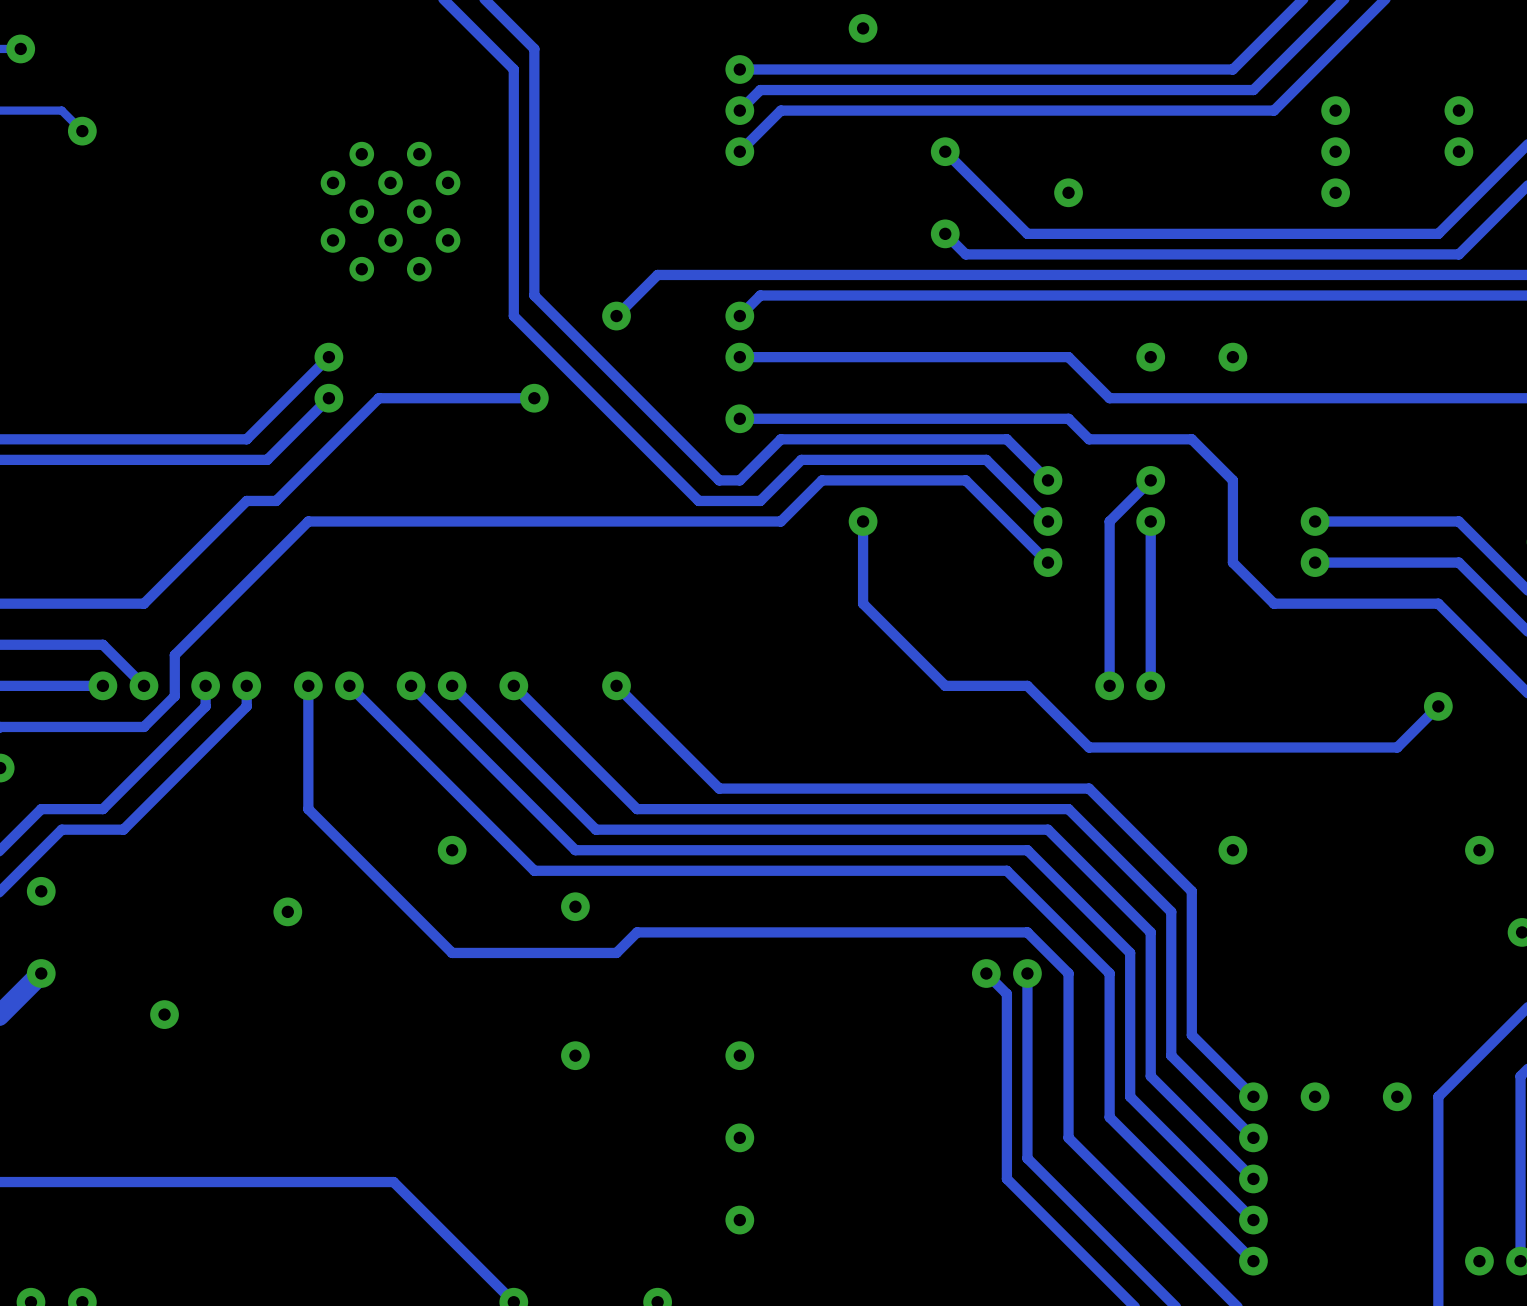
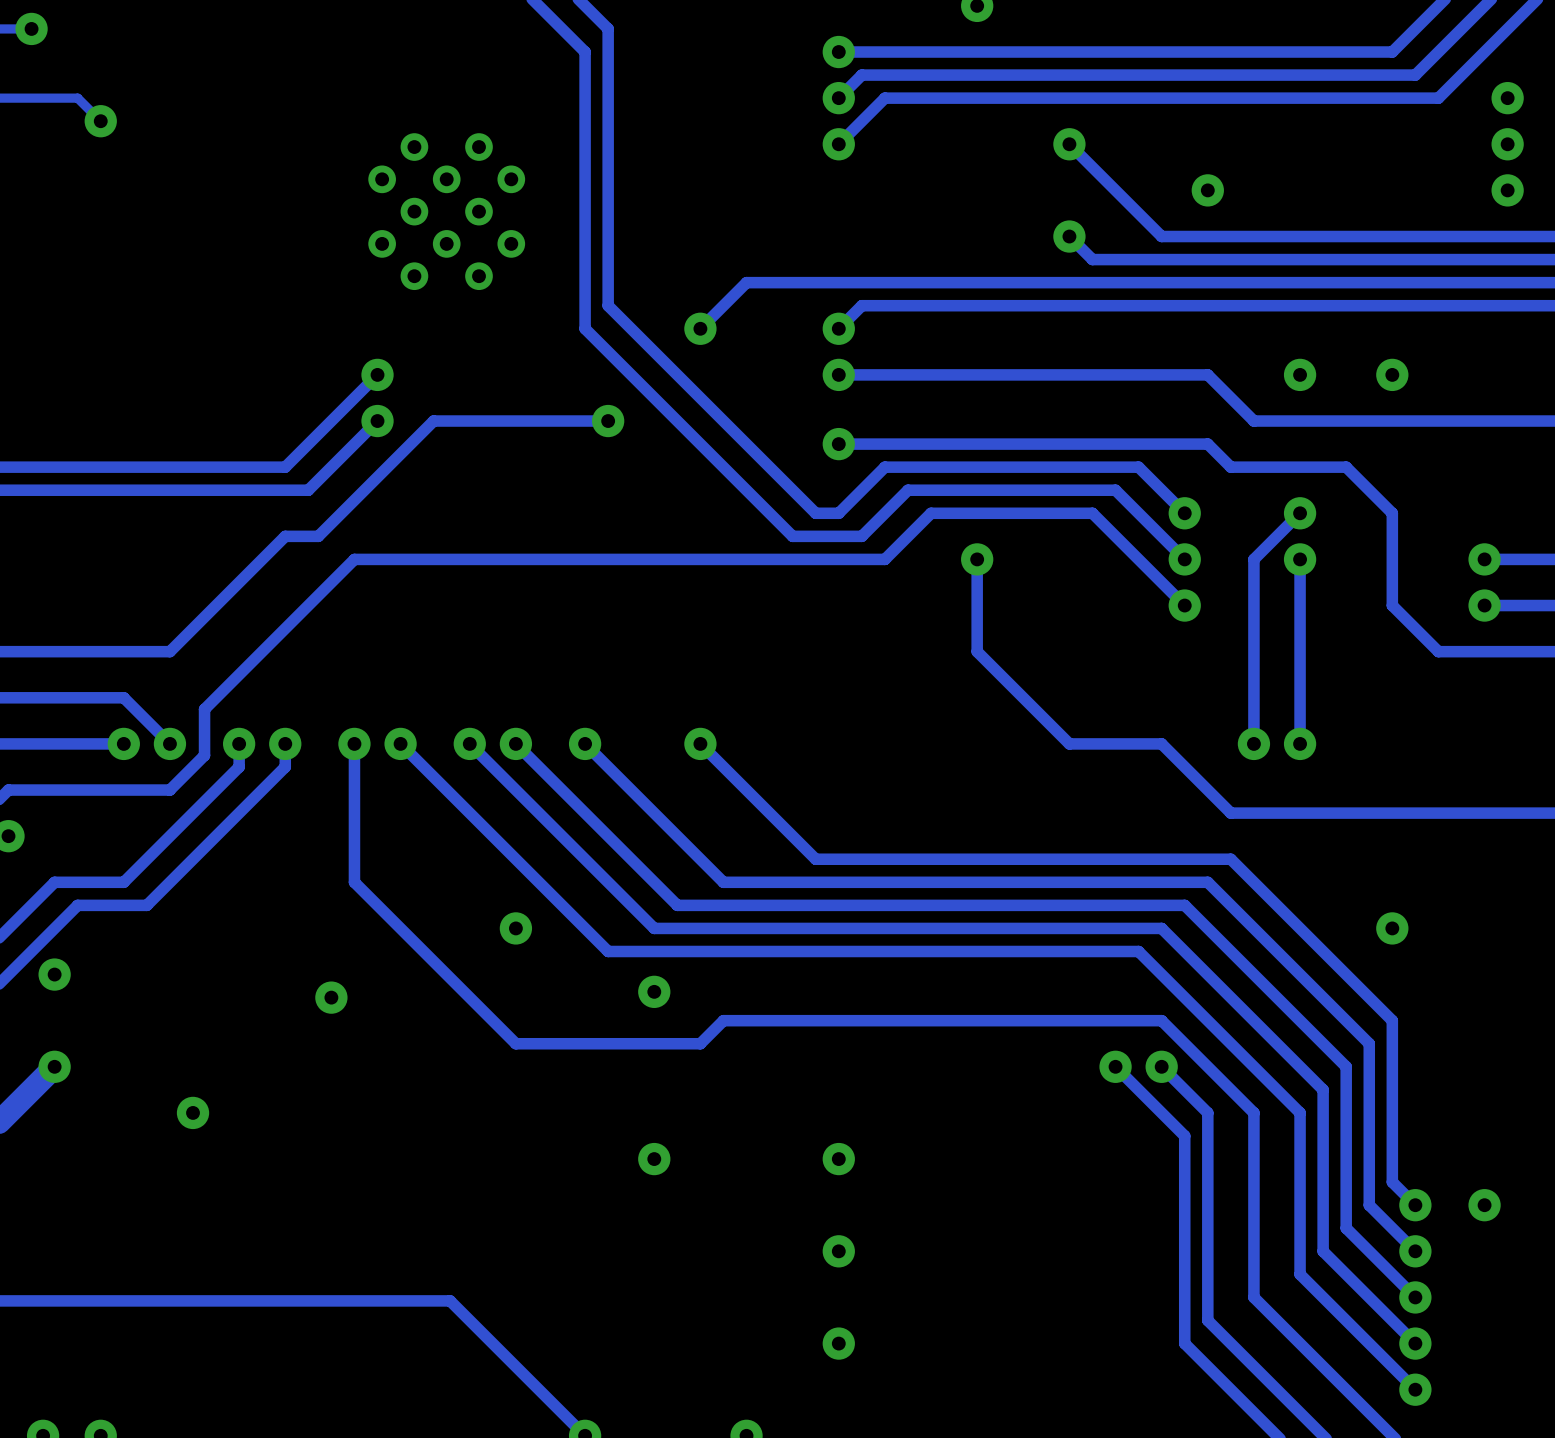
track: (1191, 891) (1191, 973) -> (1300, 1020) (1346, 1066)
track: none -> (1346, 974) (1392, 1020) (1392, 1182)
track: (1171, 911) (1171, 994) -> (1277, 1043) (1323, 1089)
track: none -> (1323, 997) (1369, 1043) (1369, 1205)
track: (1150, 932) (1150, 1014) -> none
track: (1130, 952) (1130, 1096) (1171, 1137) -> none
track: (1027, 973) (1027, 1158) (1068, 1199) -> (1161, 1066) (1207, 1112)
track: (1068, 973) (1068, 1014) -> (1207, 1066) (1253, 1112)
track: (1109, 973) (1109, 1014) -> (1253, 1066) (1300, 1112)
track: (1006, 994) (1006, 1178) (1047, 1220) -> (1138, 1089) (1184, 1136) (1184, 1343)
track: (1191, 1035) (1232, 1076) -> (1346, 1136) (1346, 1228)
track: (1171, 1055) (1212, 1096) -> (1323, 1159) (1323, 1251)
track: (1150, 1076) (1191, 1117) -> (1300, 1182) (1300, 1274)
track: (1109, 1117) (1150, 1158) -> (1253, 1228) (1253, 1297)
track: (1068, 1137) (1109, 1178) -> (1207, 1251) (1207, 1320)

